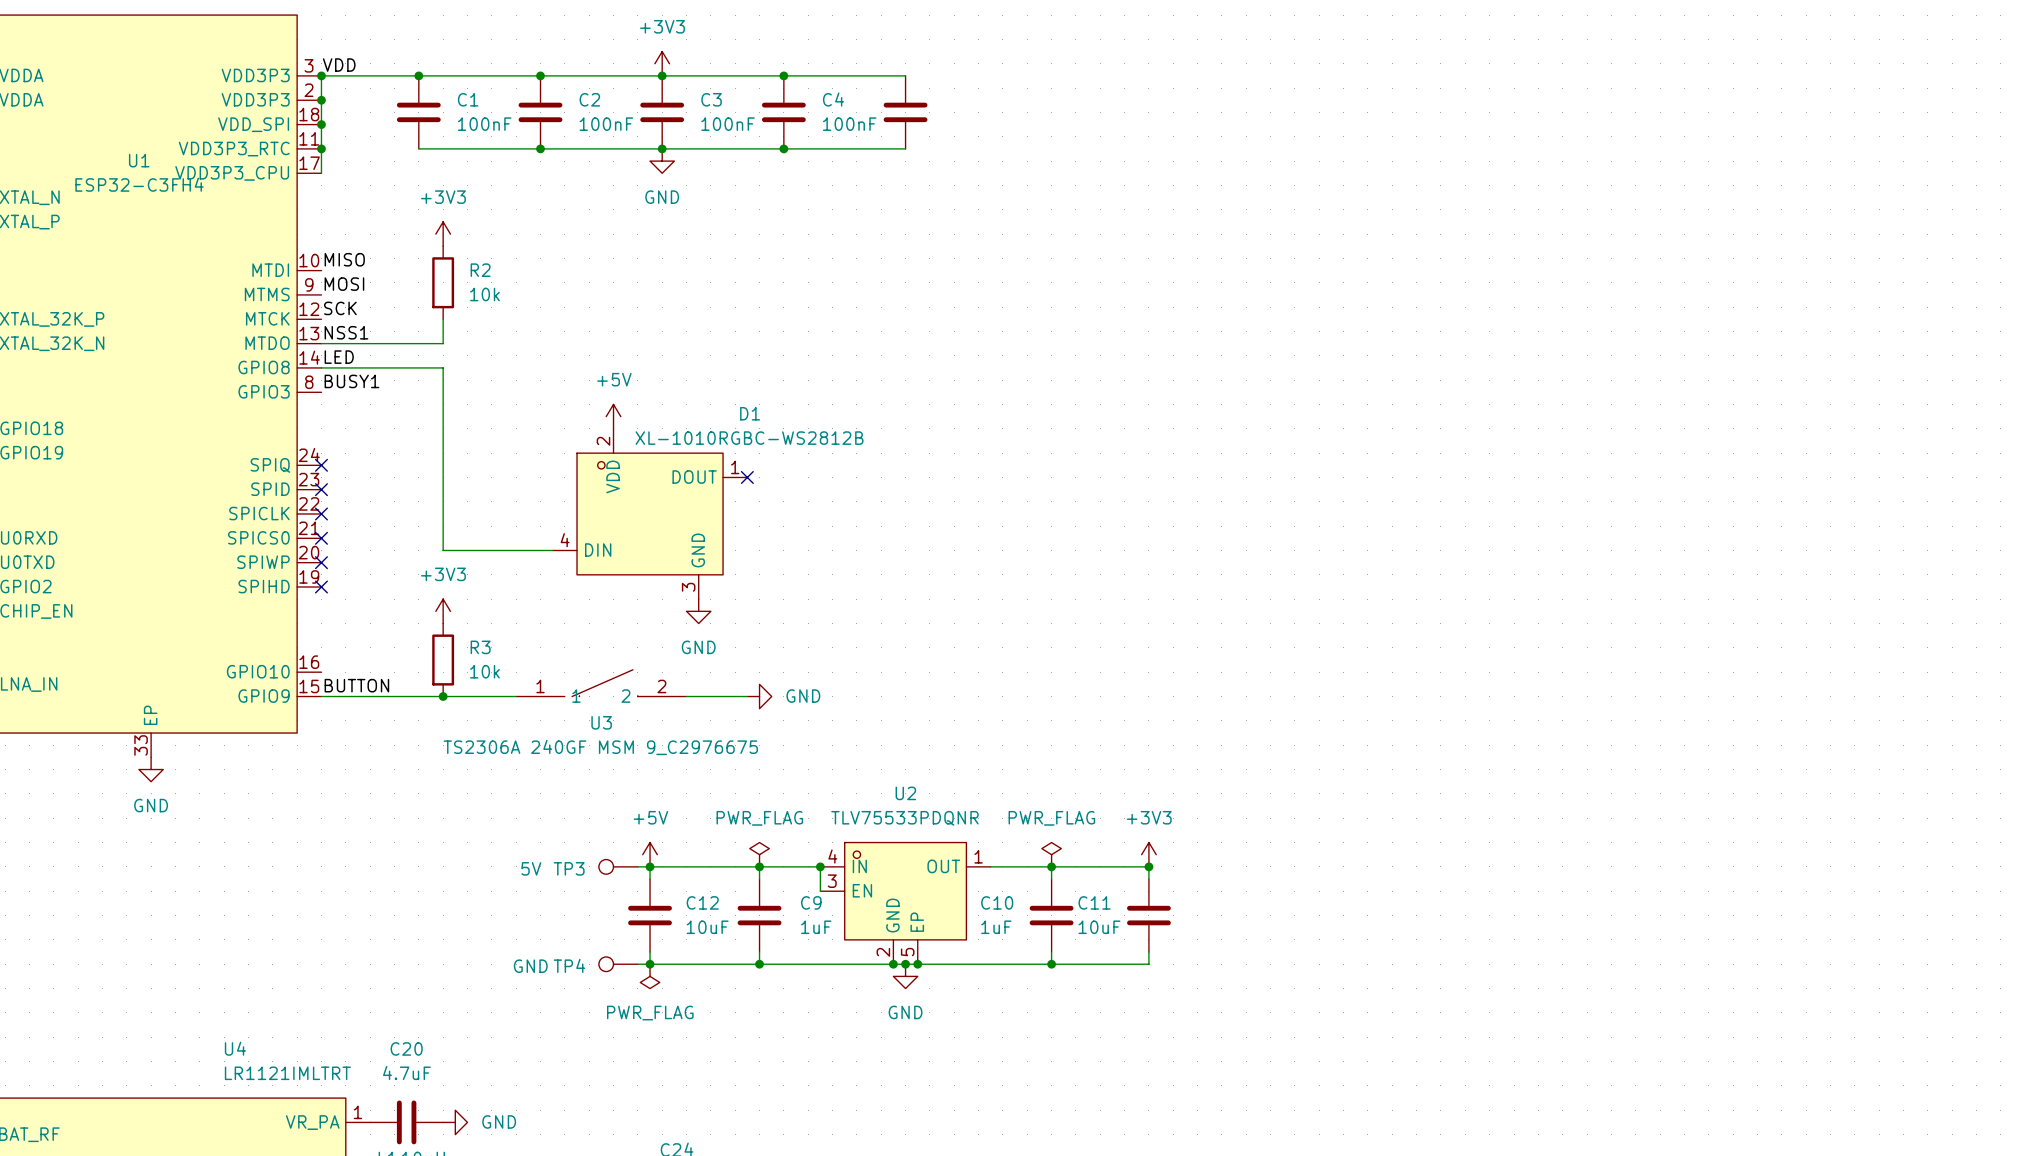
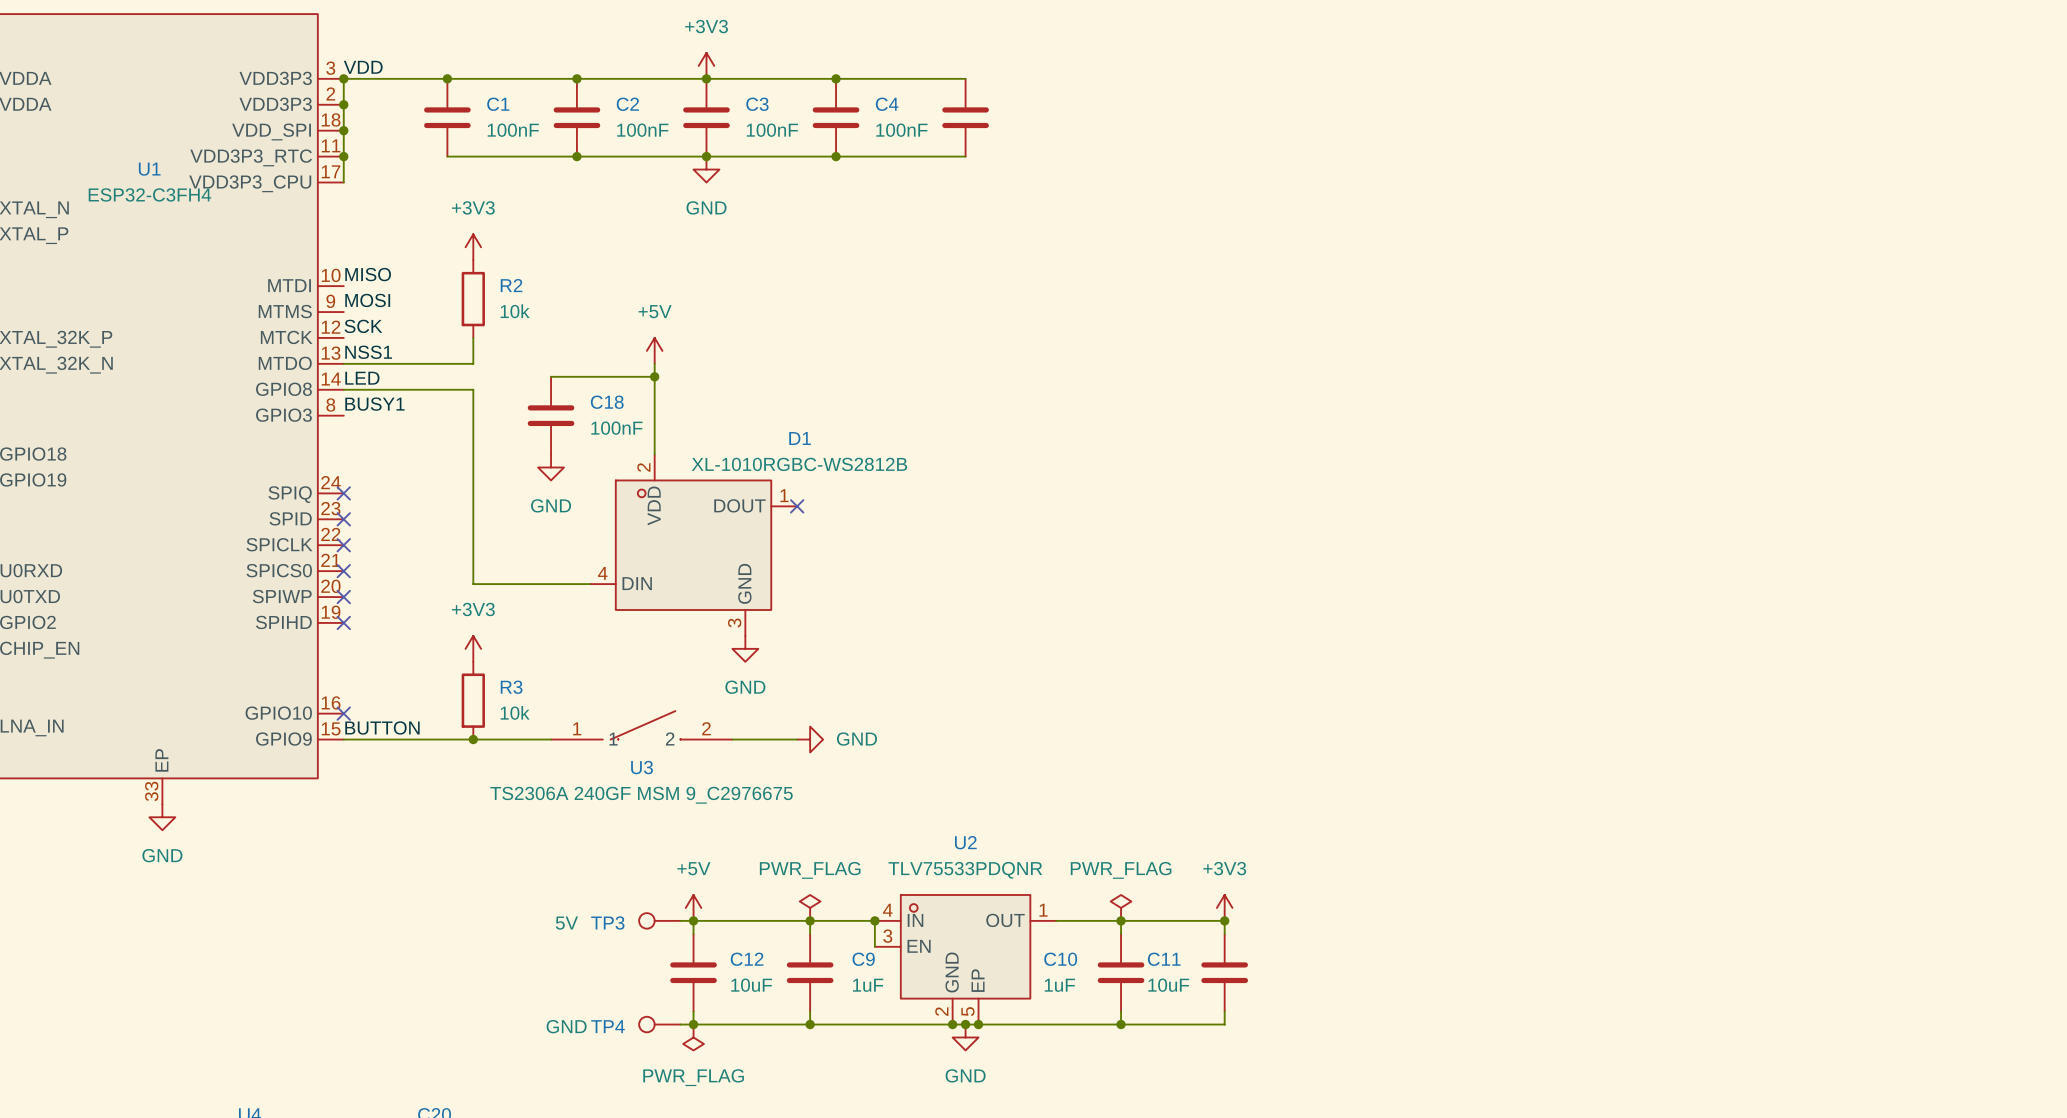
wire: none -> (654, 363) (654, 454)
wire: none -> (551, 376) (654, 376)
junction: none -> (654, 376)
C18: none -> 100nF (551, 415)
power symbol position: +5V (613, 416) -> +5V (654, 350)
power symbol: none -> GND (551, 467)
no-connect mark: none -> (343, 713)

